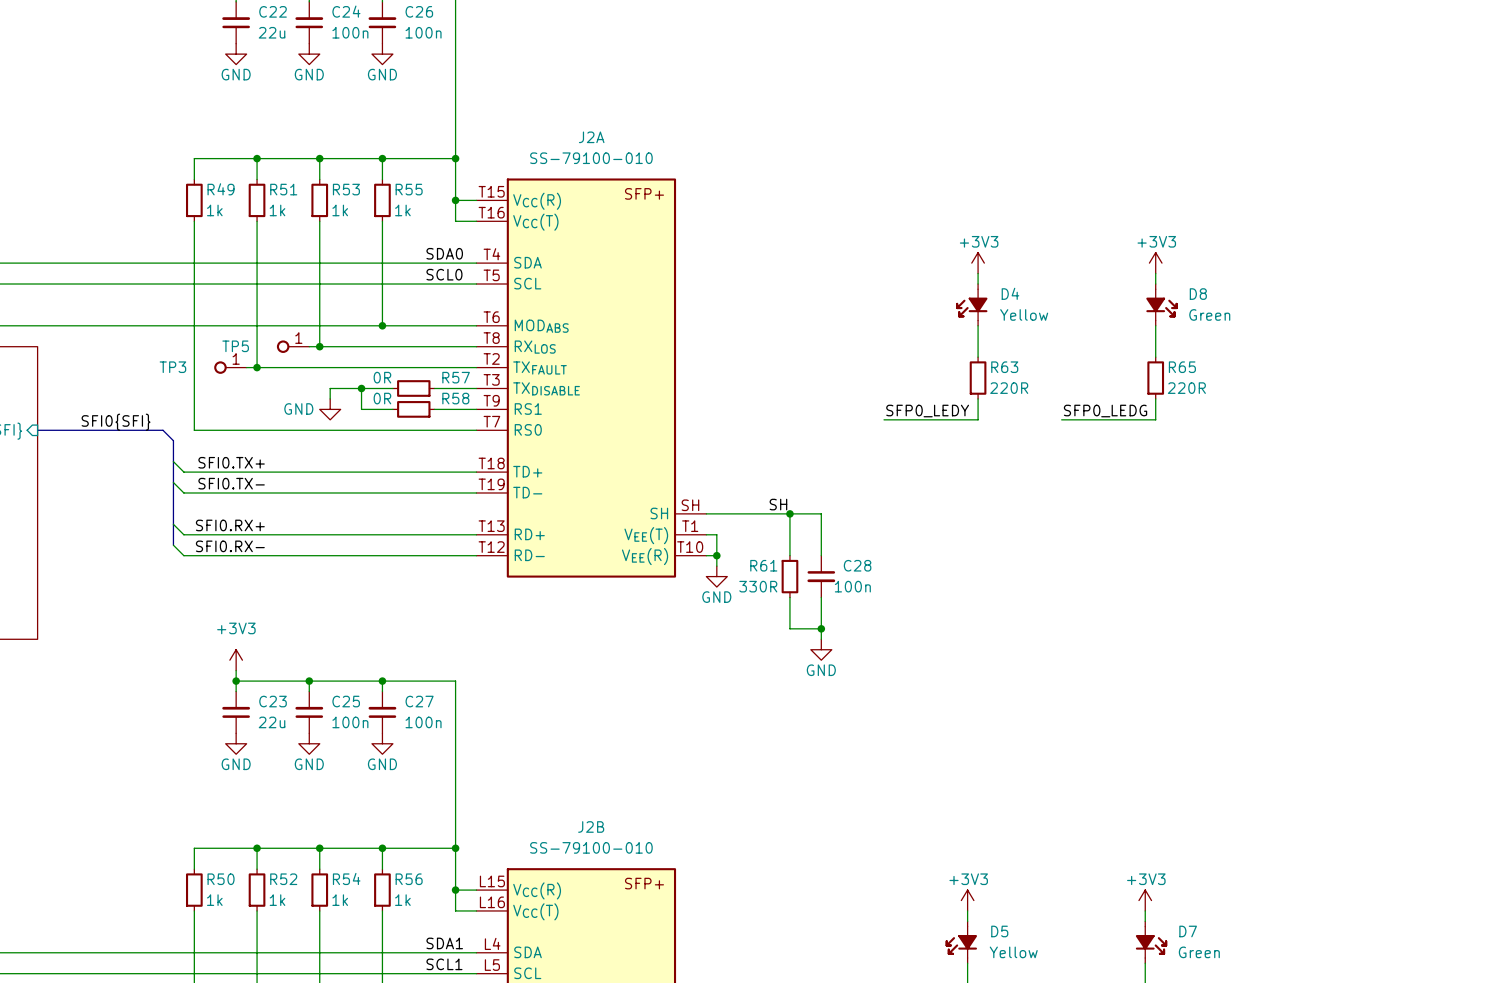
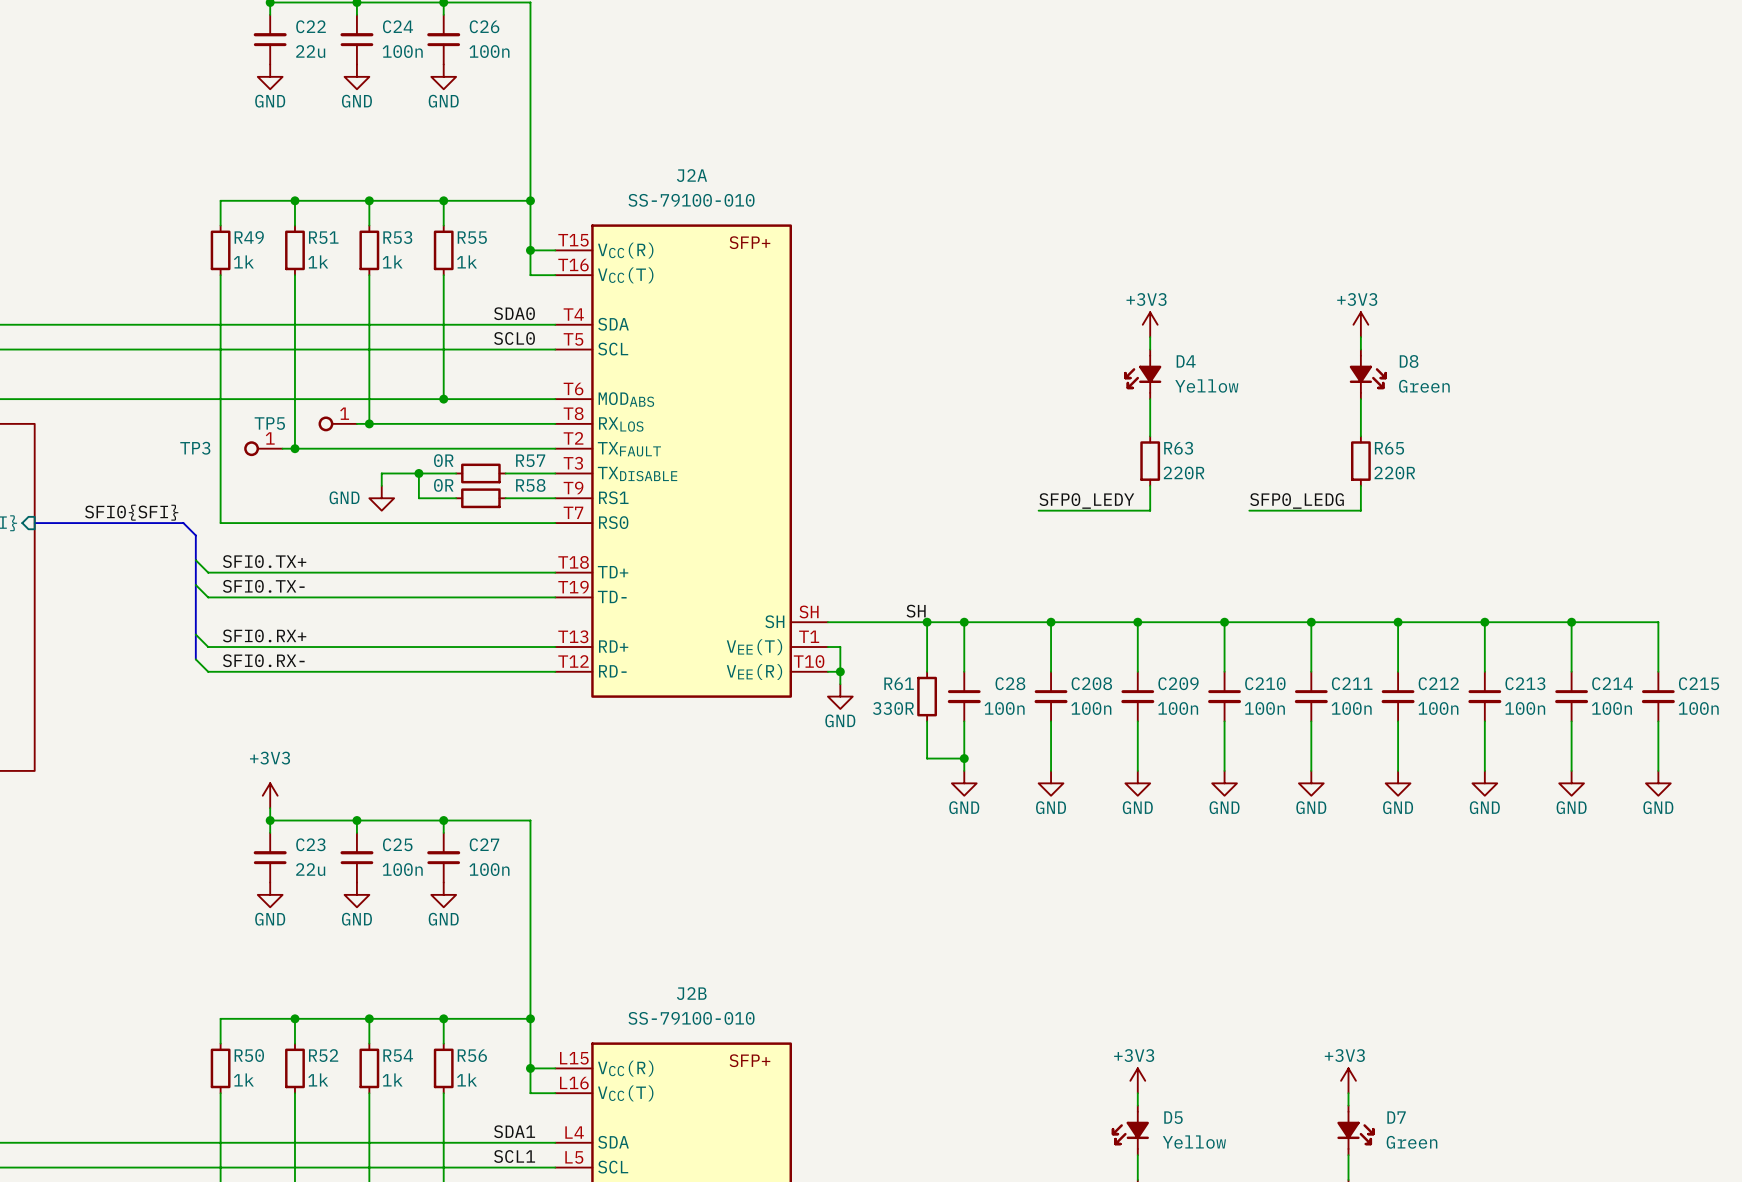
wire: none -> (964, 622) (1658, 622) (1658, 671)
junction: none -> (964, 622)
wire: none -> (1051, 622) (1051, 671)
junction: none -> (1051, 622)
wire: none -> (1137, 622) (1137, 671)
junction: none -> (1137, 622)
wire: none -> (1224, 622) (1224, 671)
junction: none -> (1224, 622)
wire: none -> (1311, 622) (1311, 671)
junction: none -> (1311, 622)
wire: none -> (1398, 622) (1398, 671)
junction: none -> (1398, 622)
wire: none -> (1484, 622) (1484, 671)
junction: none -> (1484, 622)
wire: none -> (1571, 622) (1571, 671)
junction: none -> (1571, 622)
C208: none -> (1051, 696)
C209: none -> (1137, 696)
C210: none -> (1224, 696)
C211: none -> (1311, 696)
C212: none -> (1398, 696)
C213: none -> (1484, 696)
C214: none -> (1571, 696)
C215: none -> (1658, 696)
wire: none -> (1051, 721) (1051, 770)
wire: none -> (1137, 721) (1137, 770)
wire: none -> (1224, 721) (1224, 770)
wire: none -> (1311, 721) (1311, 770)
wire: none -> (1398, 721) (1398, 770)
wire: none -> (1484, 721) (1484, 770)
wire: none -> (1571, 721) (1571, 770)
wire: none -> (1658, 721) (1658, 770)
power symbol: none -> GND (1051, 783)
power symbol: none -> GND (1137, 783)
power symbol: none -> GND (1224, 783)
power symbol: none -> GND (1311, 783)
power symbol: none -> GND (1398, 783)
power symbol: none -> GND (1484, 783)
power symbol: none -> GND (1571, 783)
power symbol: none -> GND (1658, 783)

